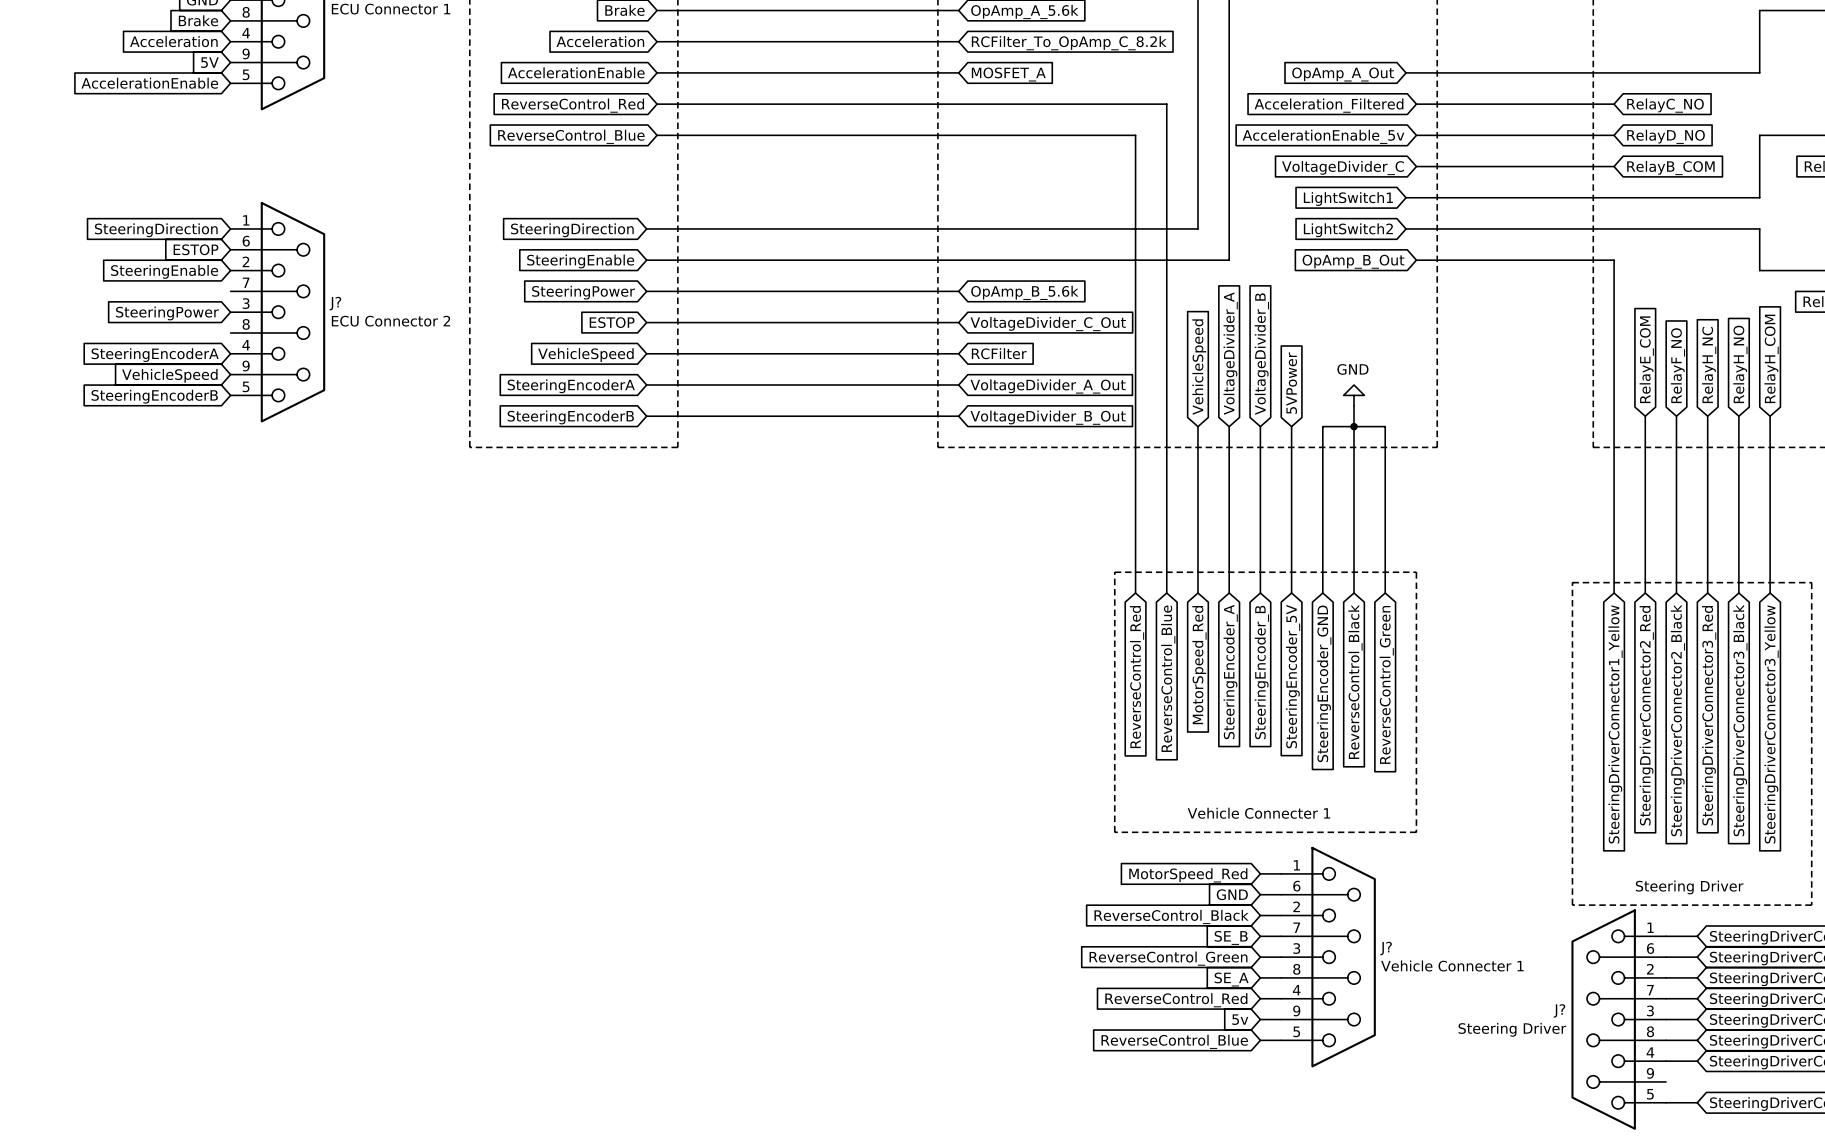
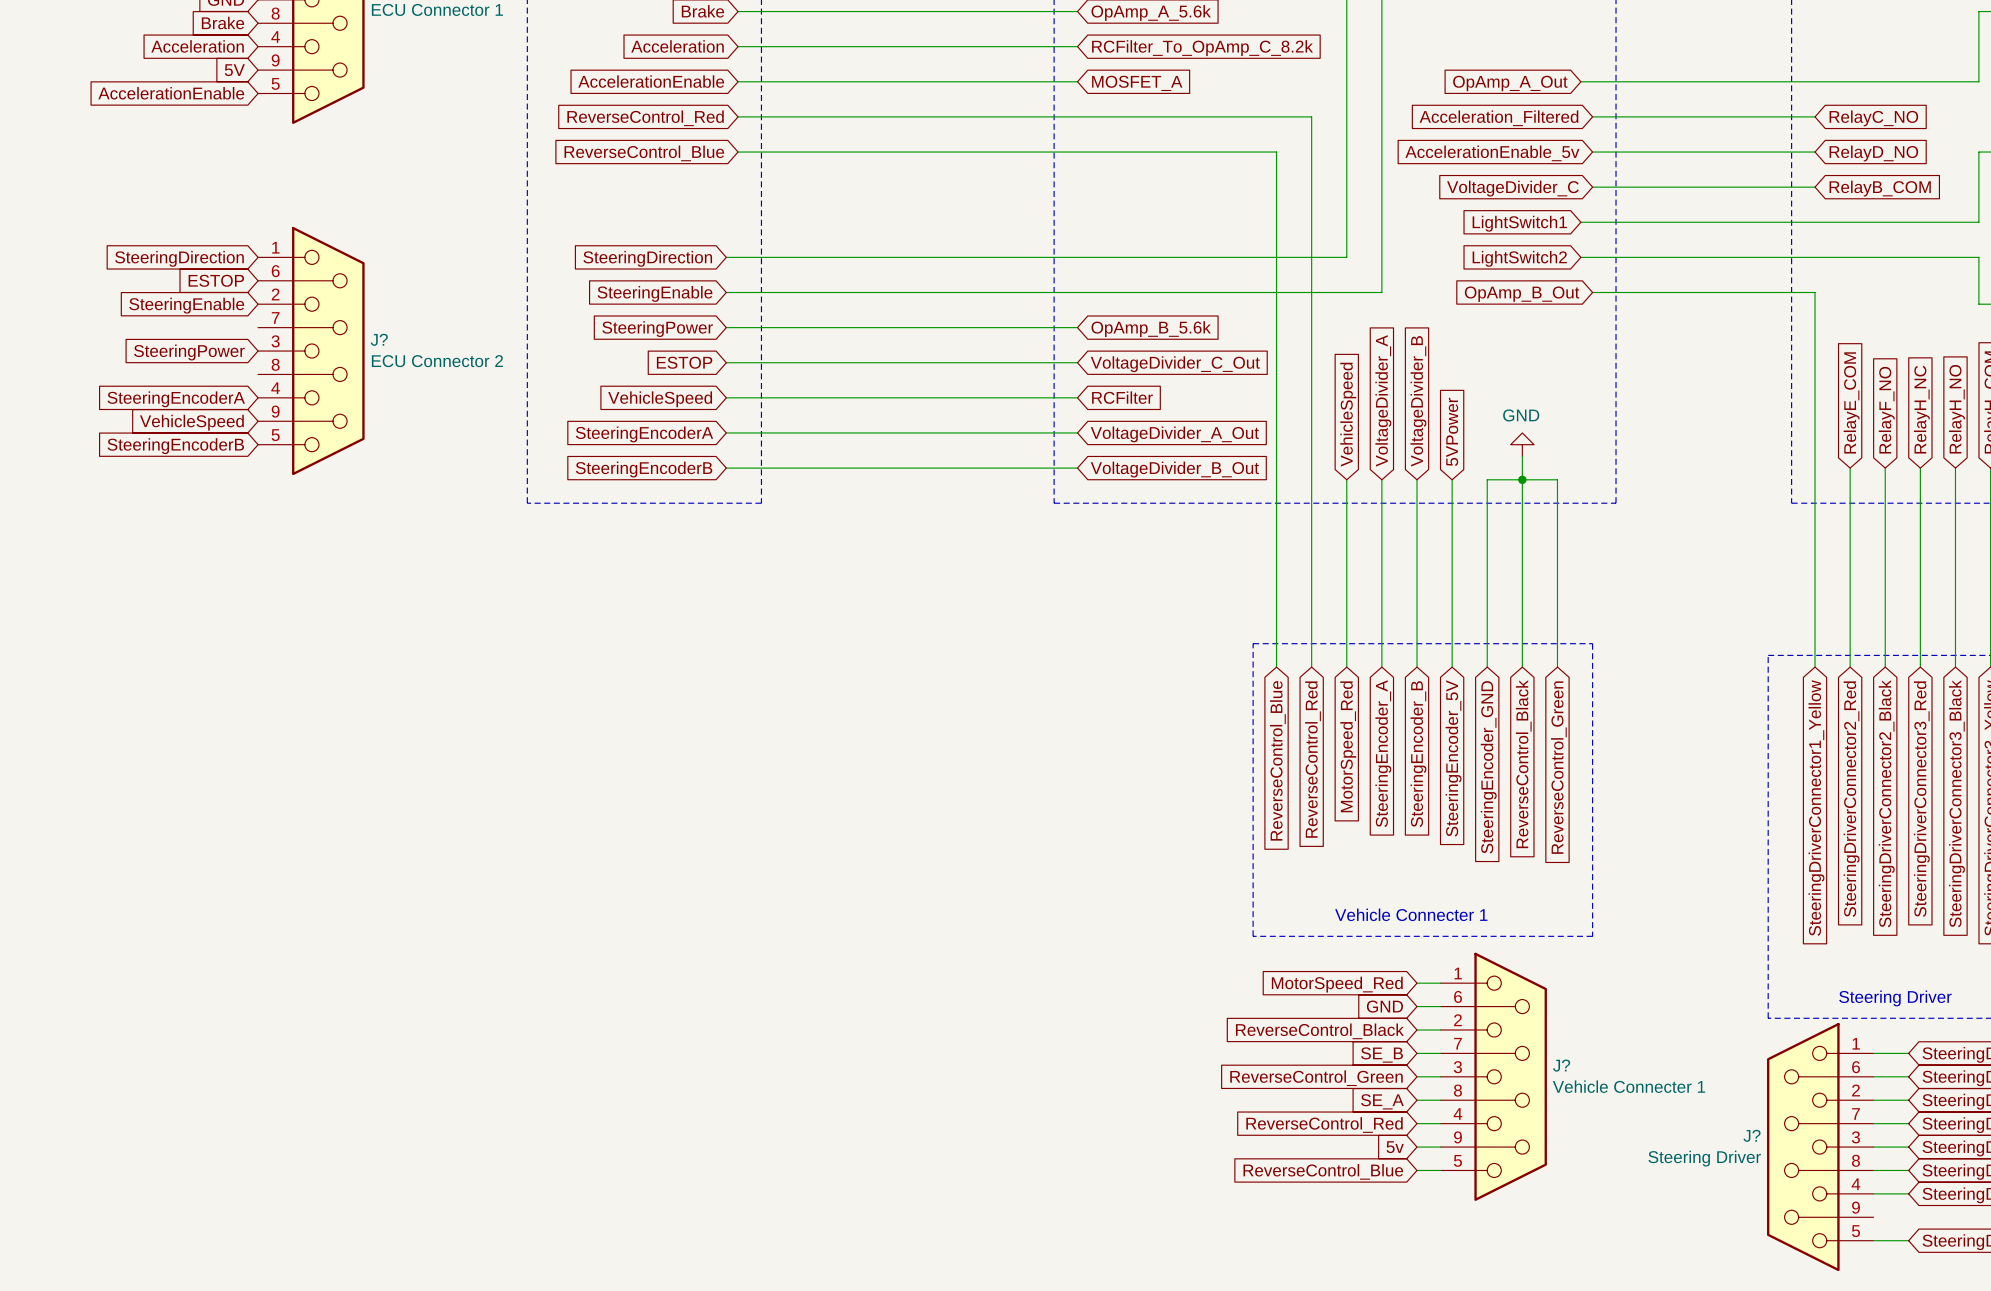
global label: ReverseControl_Red (1137, 677) -> ReverseControl_Blue (1277, 760)
global label: ReverseControl_Blue (1168, 678) -> ReverseControl_Red (1313, 759)

